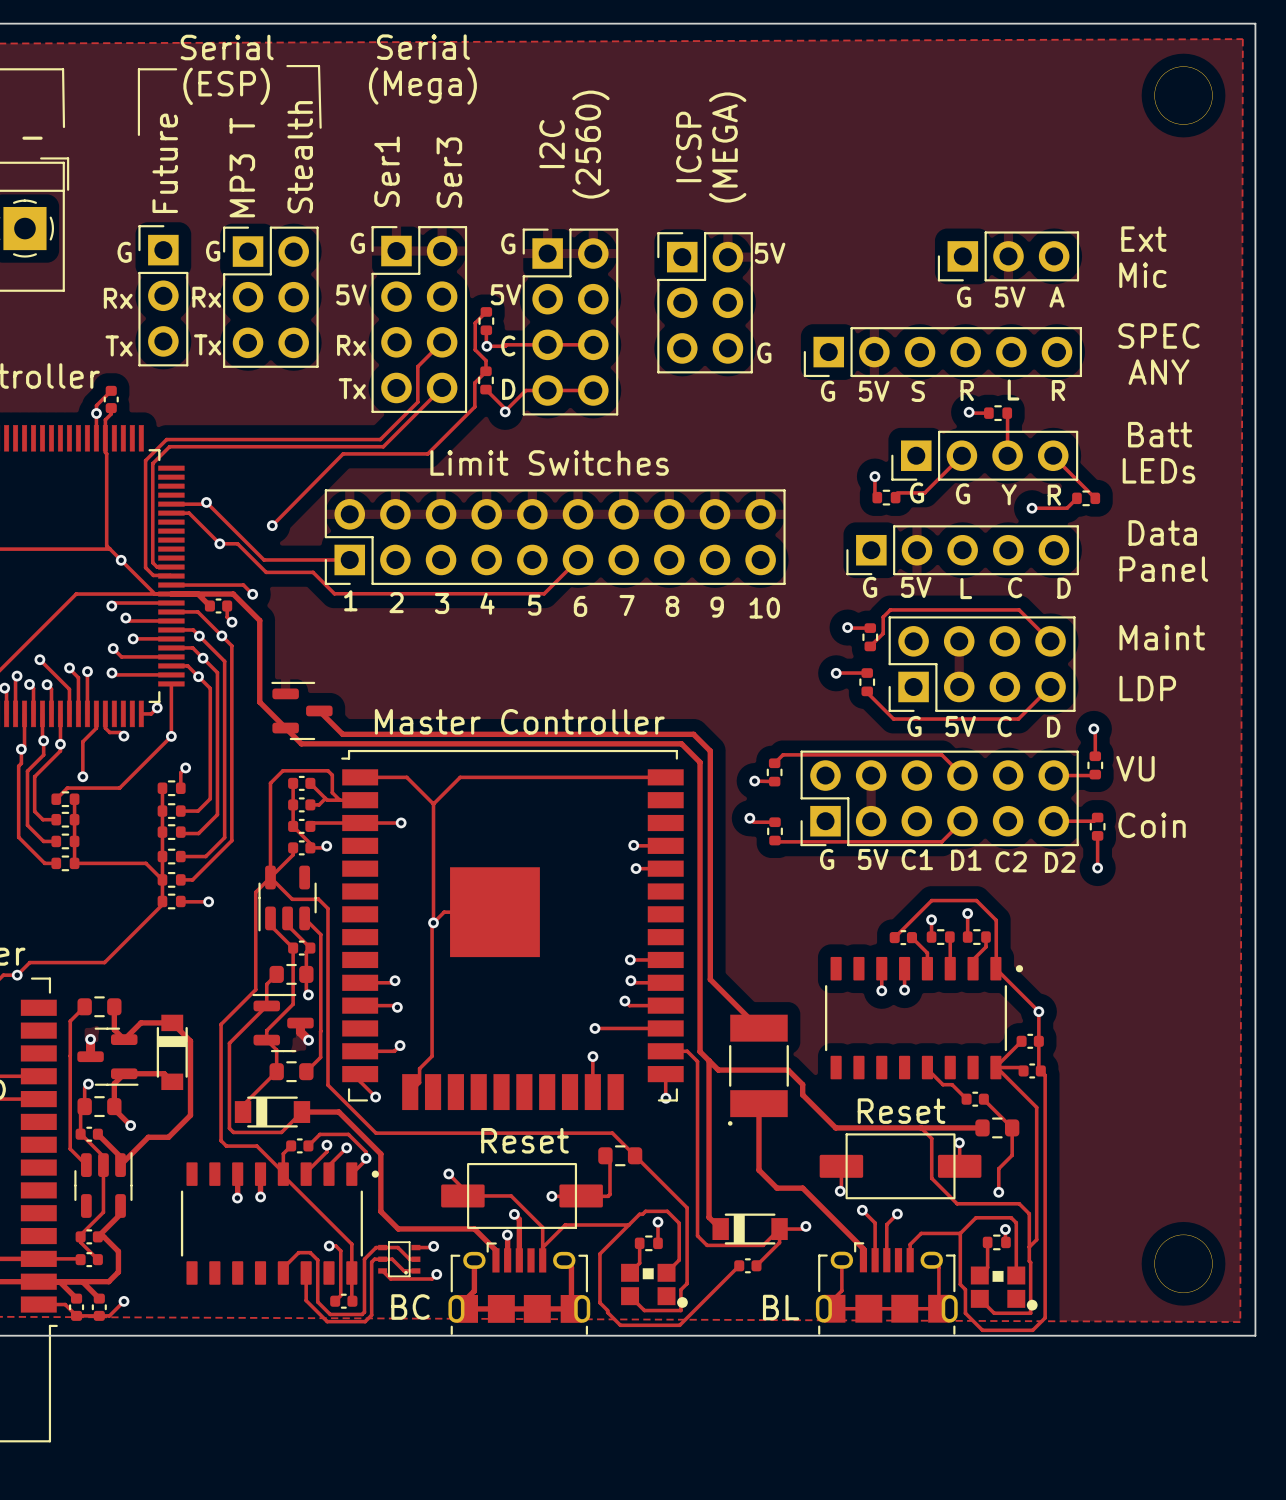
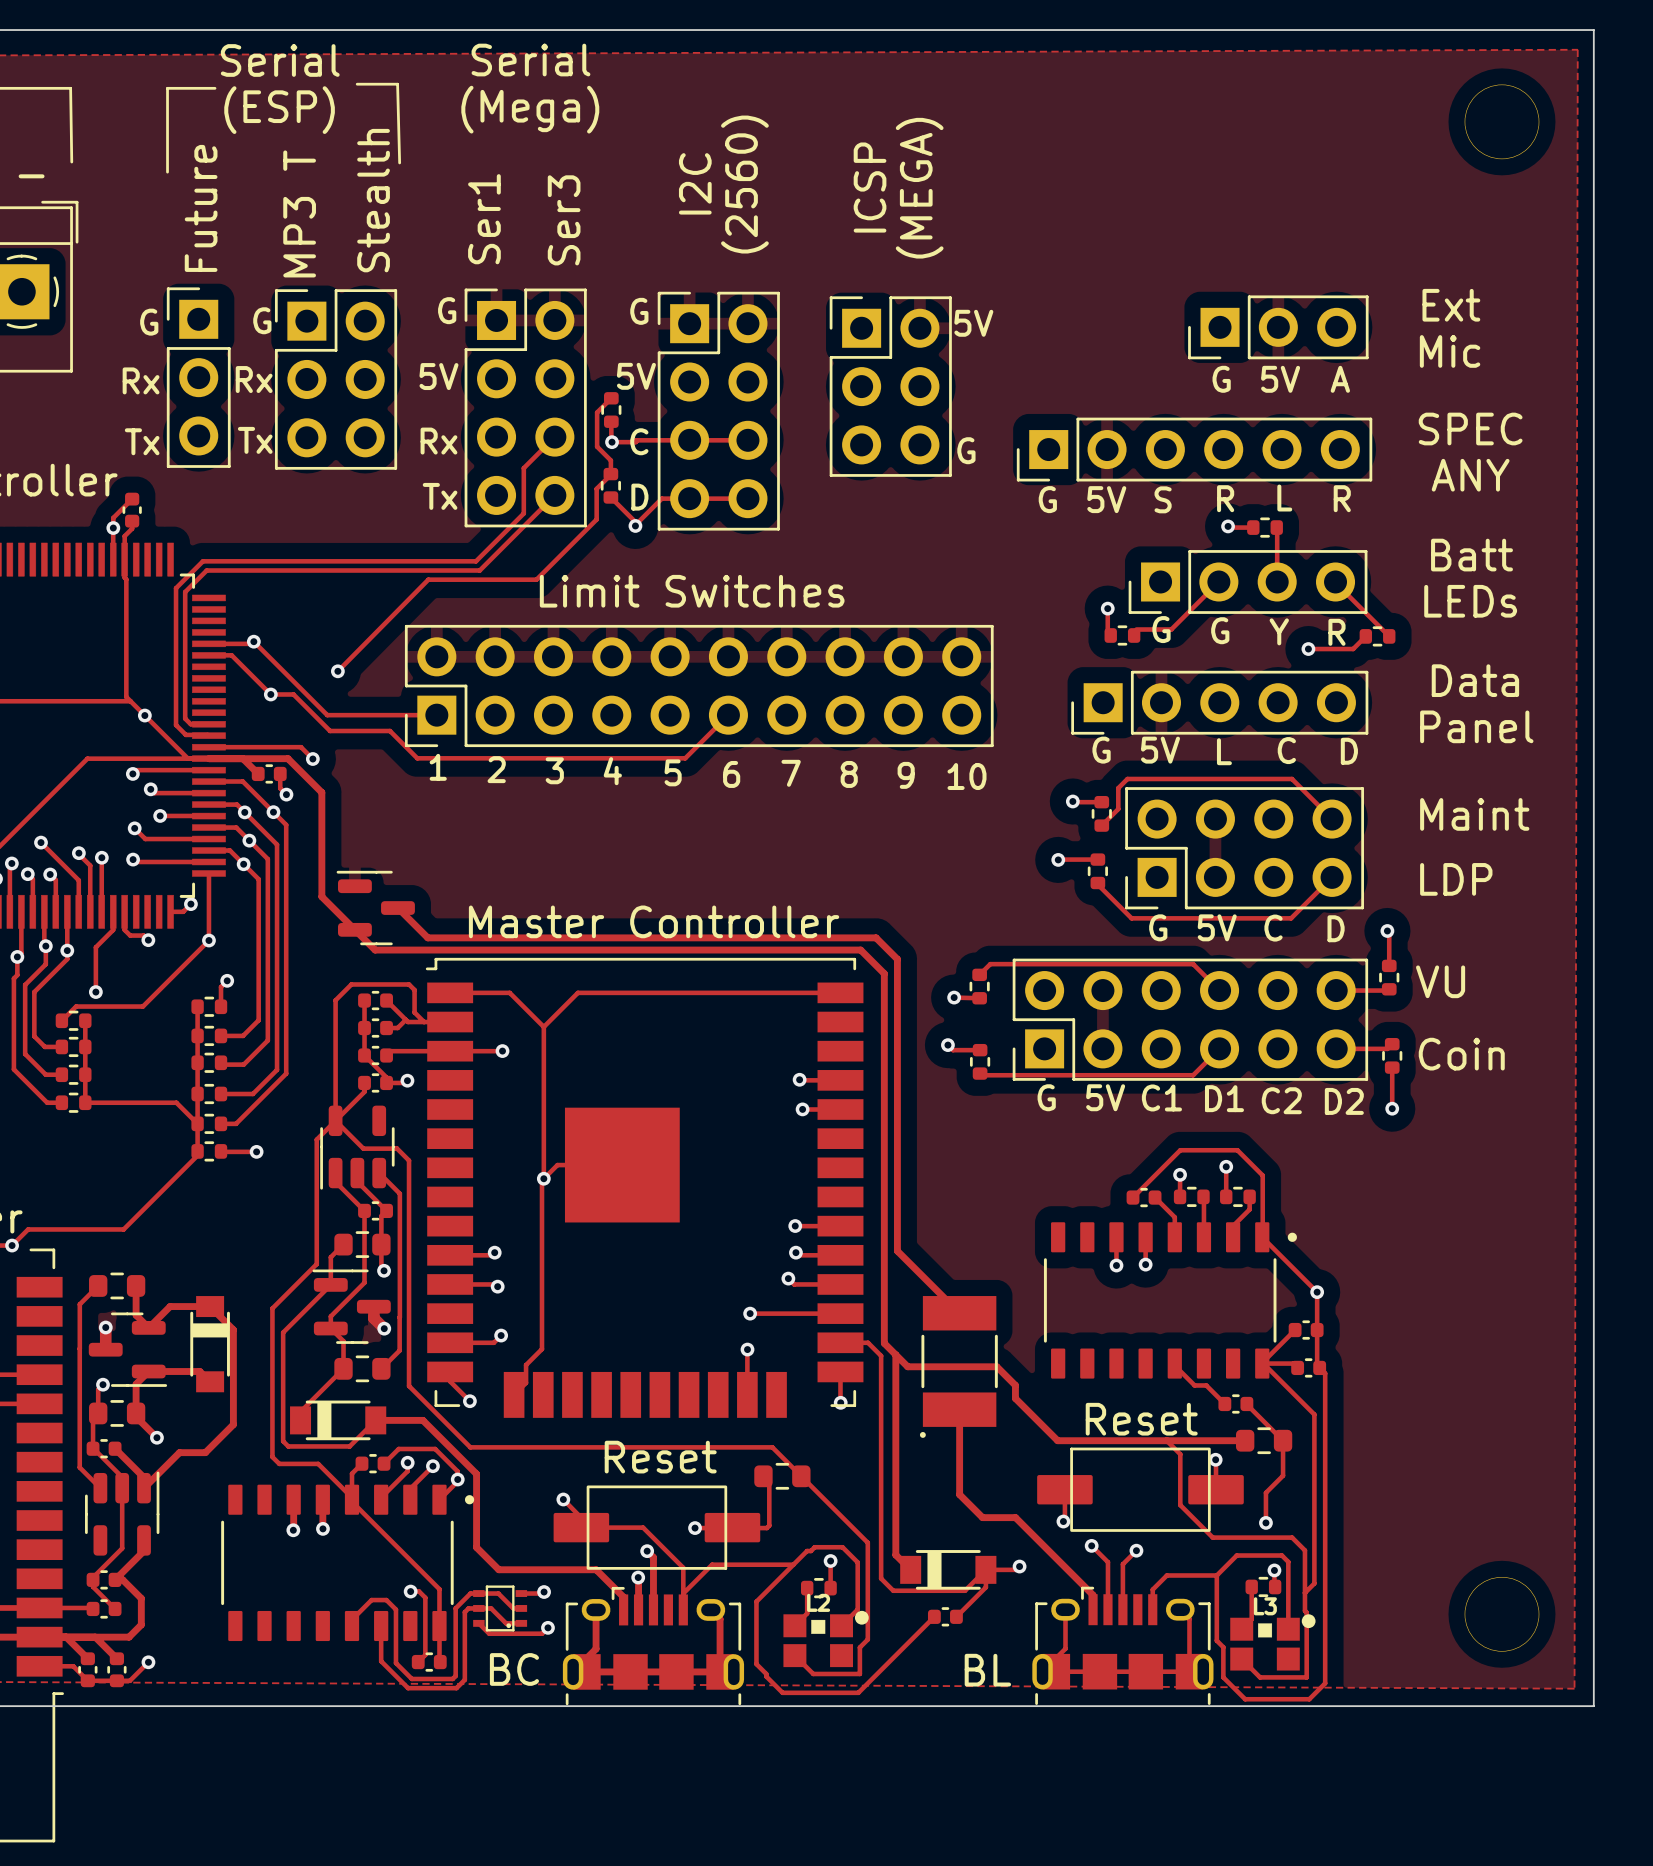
L2: none -> (826, 1638)
part: (654, 1285) -> none
L3: none -> (1272, 1642)
part: (1004, 1288) -> none

